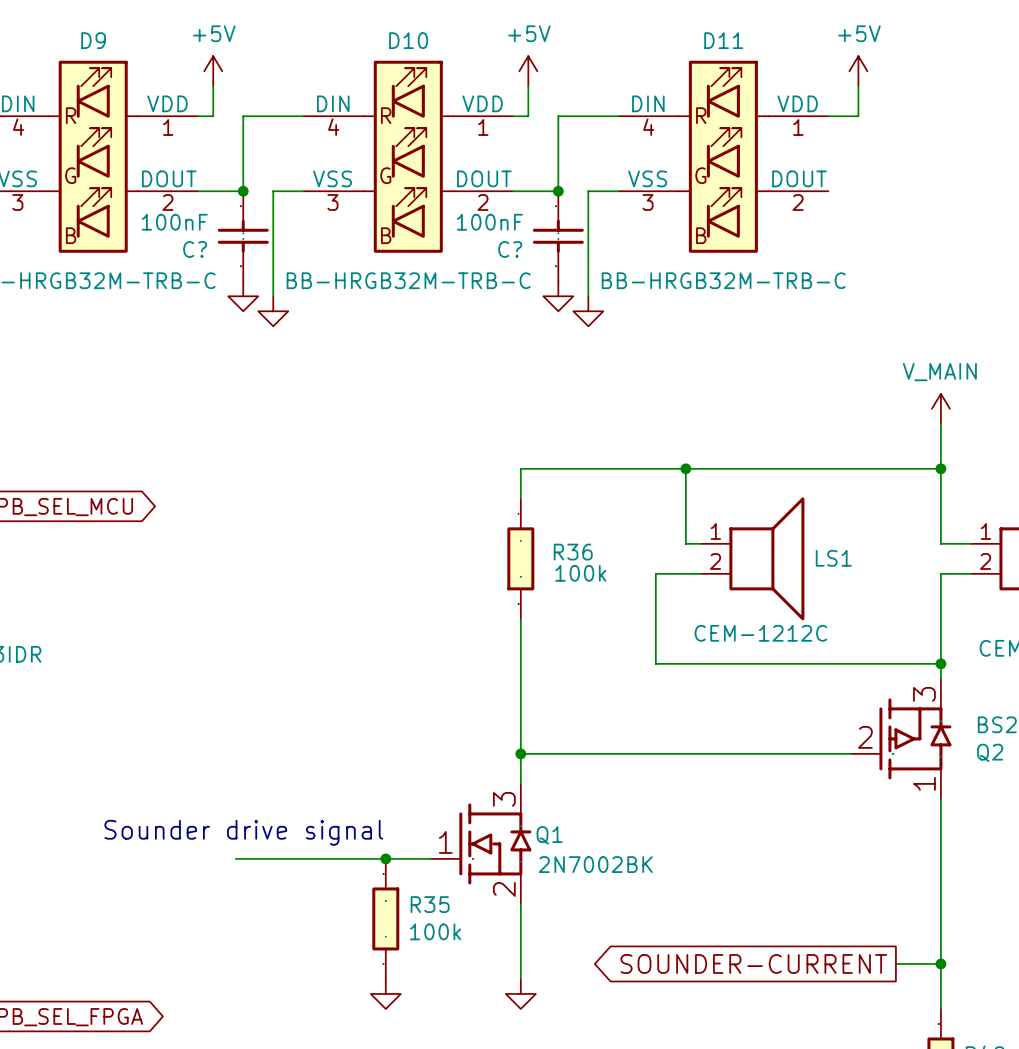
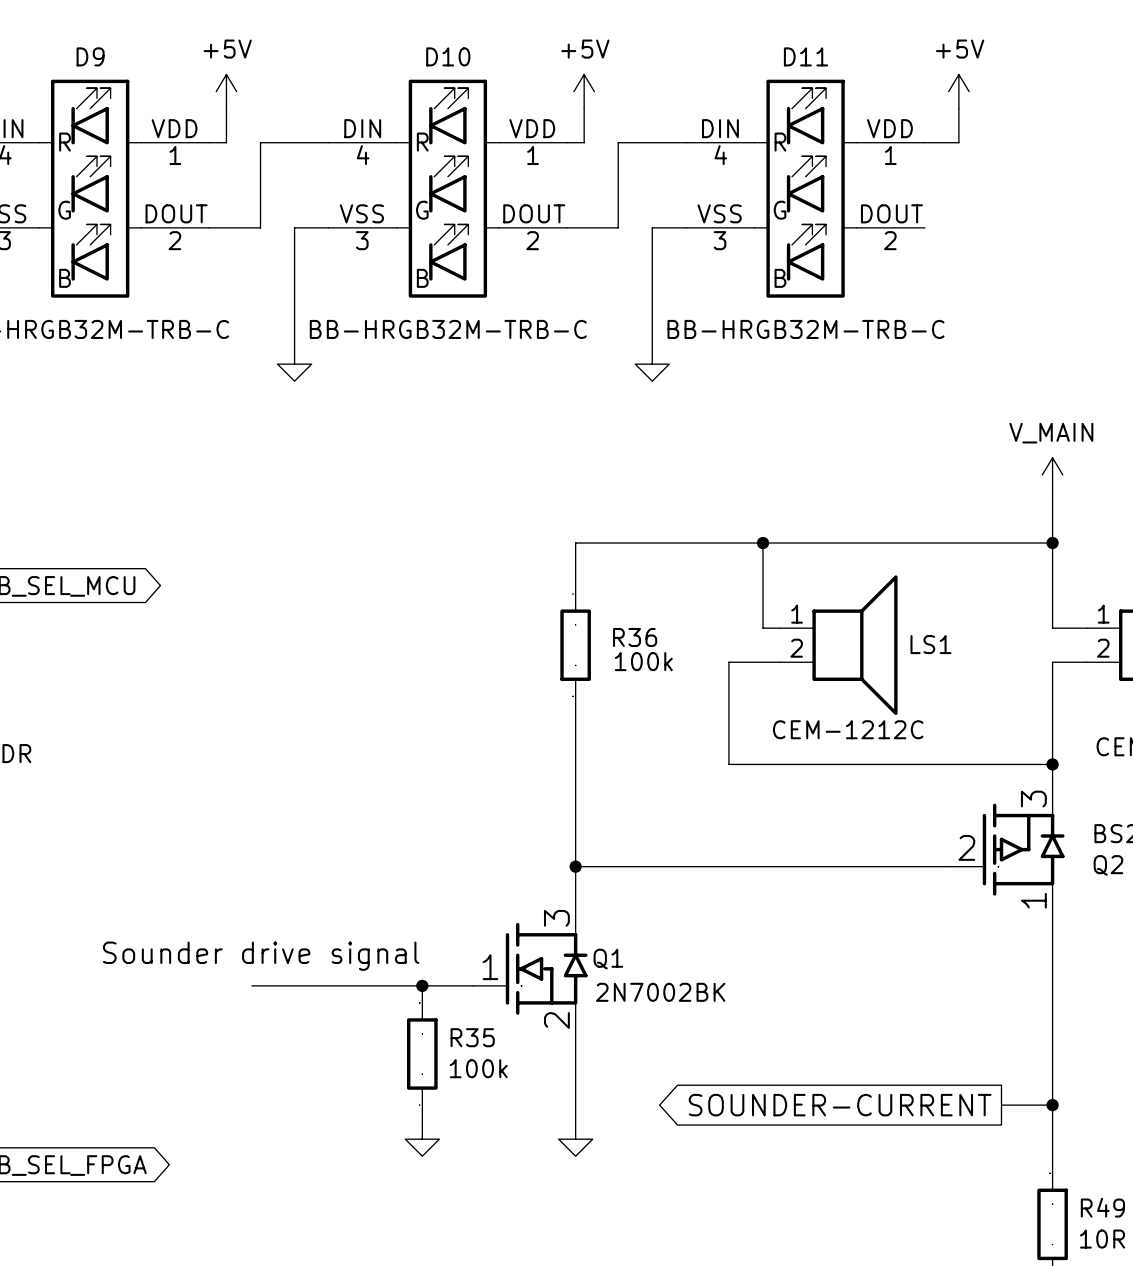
junction: (243, 191) -> none
junction: (558, 191) -> none
C?: (243, 236) -> none
C?: (558, 236) -> none
power symbol: (243, 296) -> none
power symbol: (558, 296) -> none

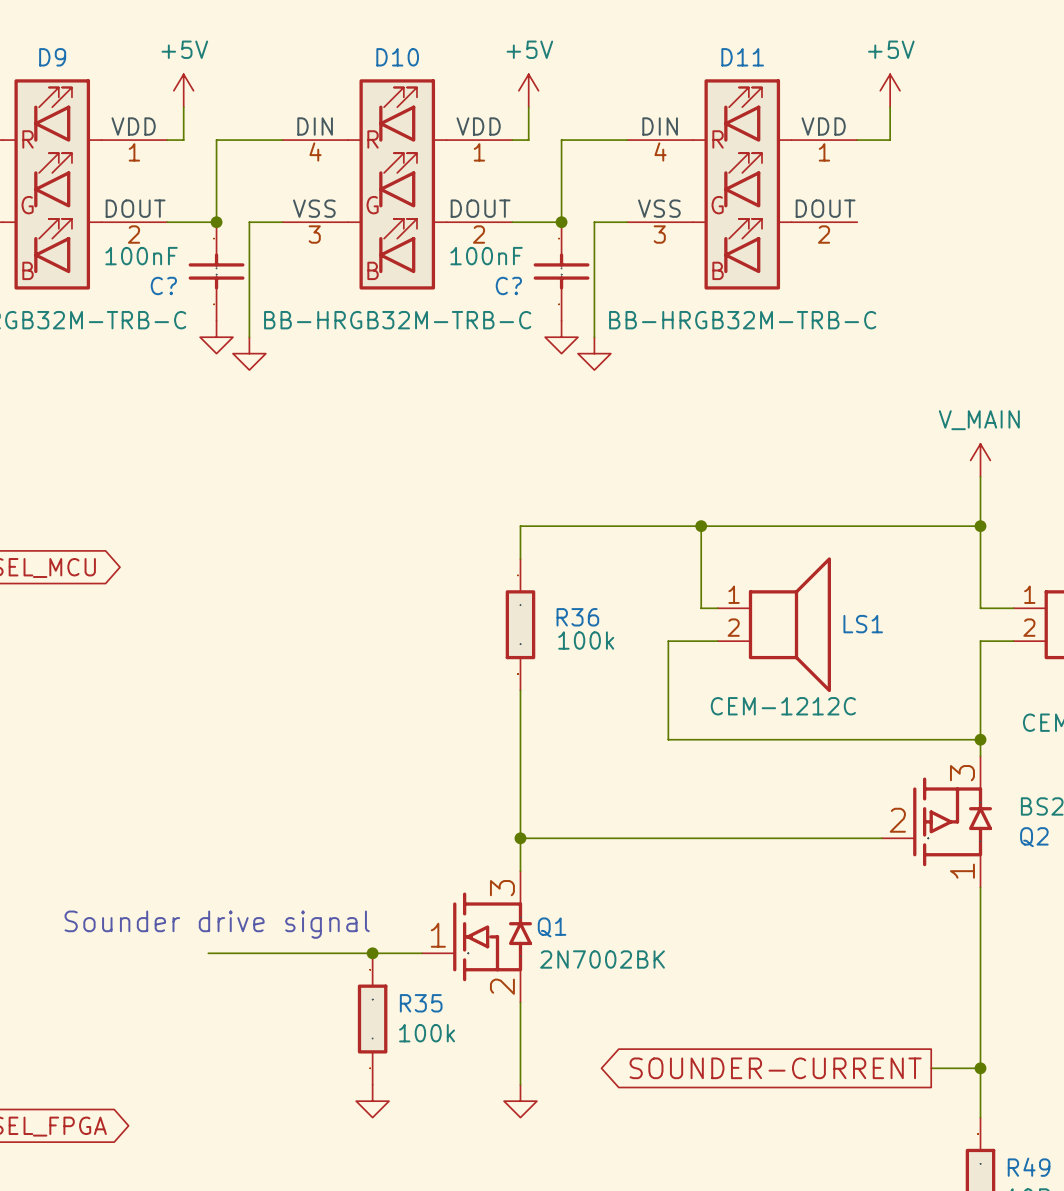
junction: none -> (216, 222)
junction: none -> (561, 222)
C?: none -> (216, 271)
C?: none -> (561, 271)
power symbol: none -> (216, 337)
power symbol: none -> (561, 337)

